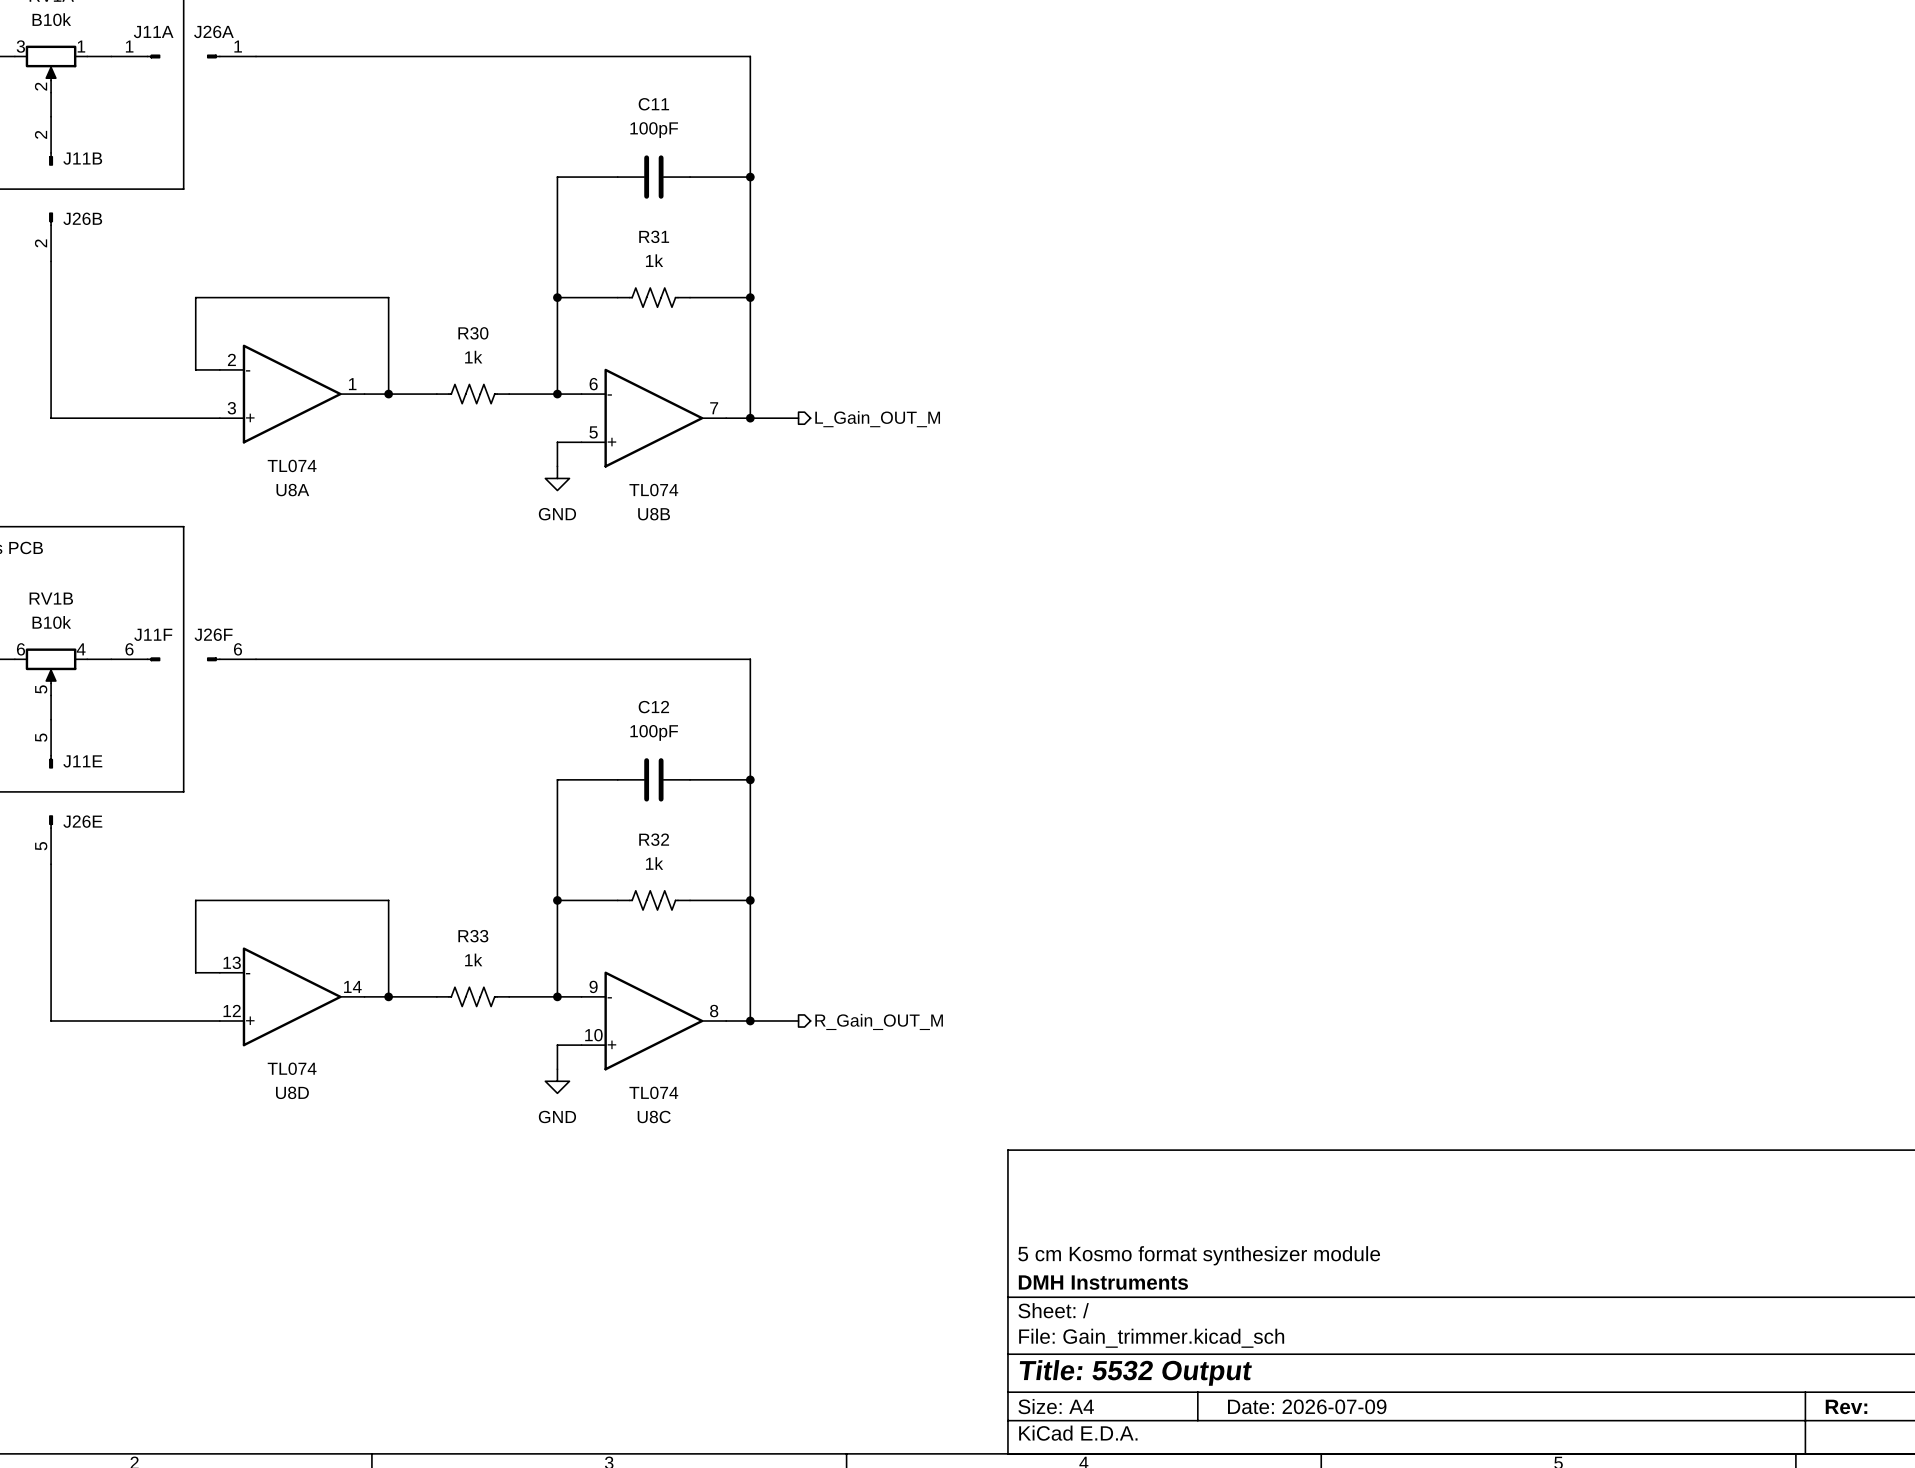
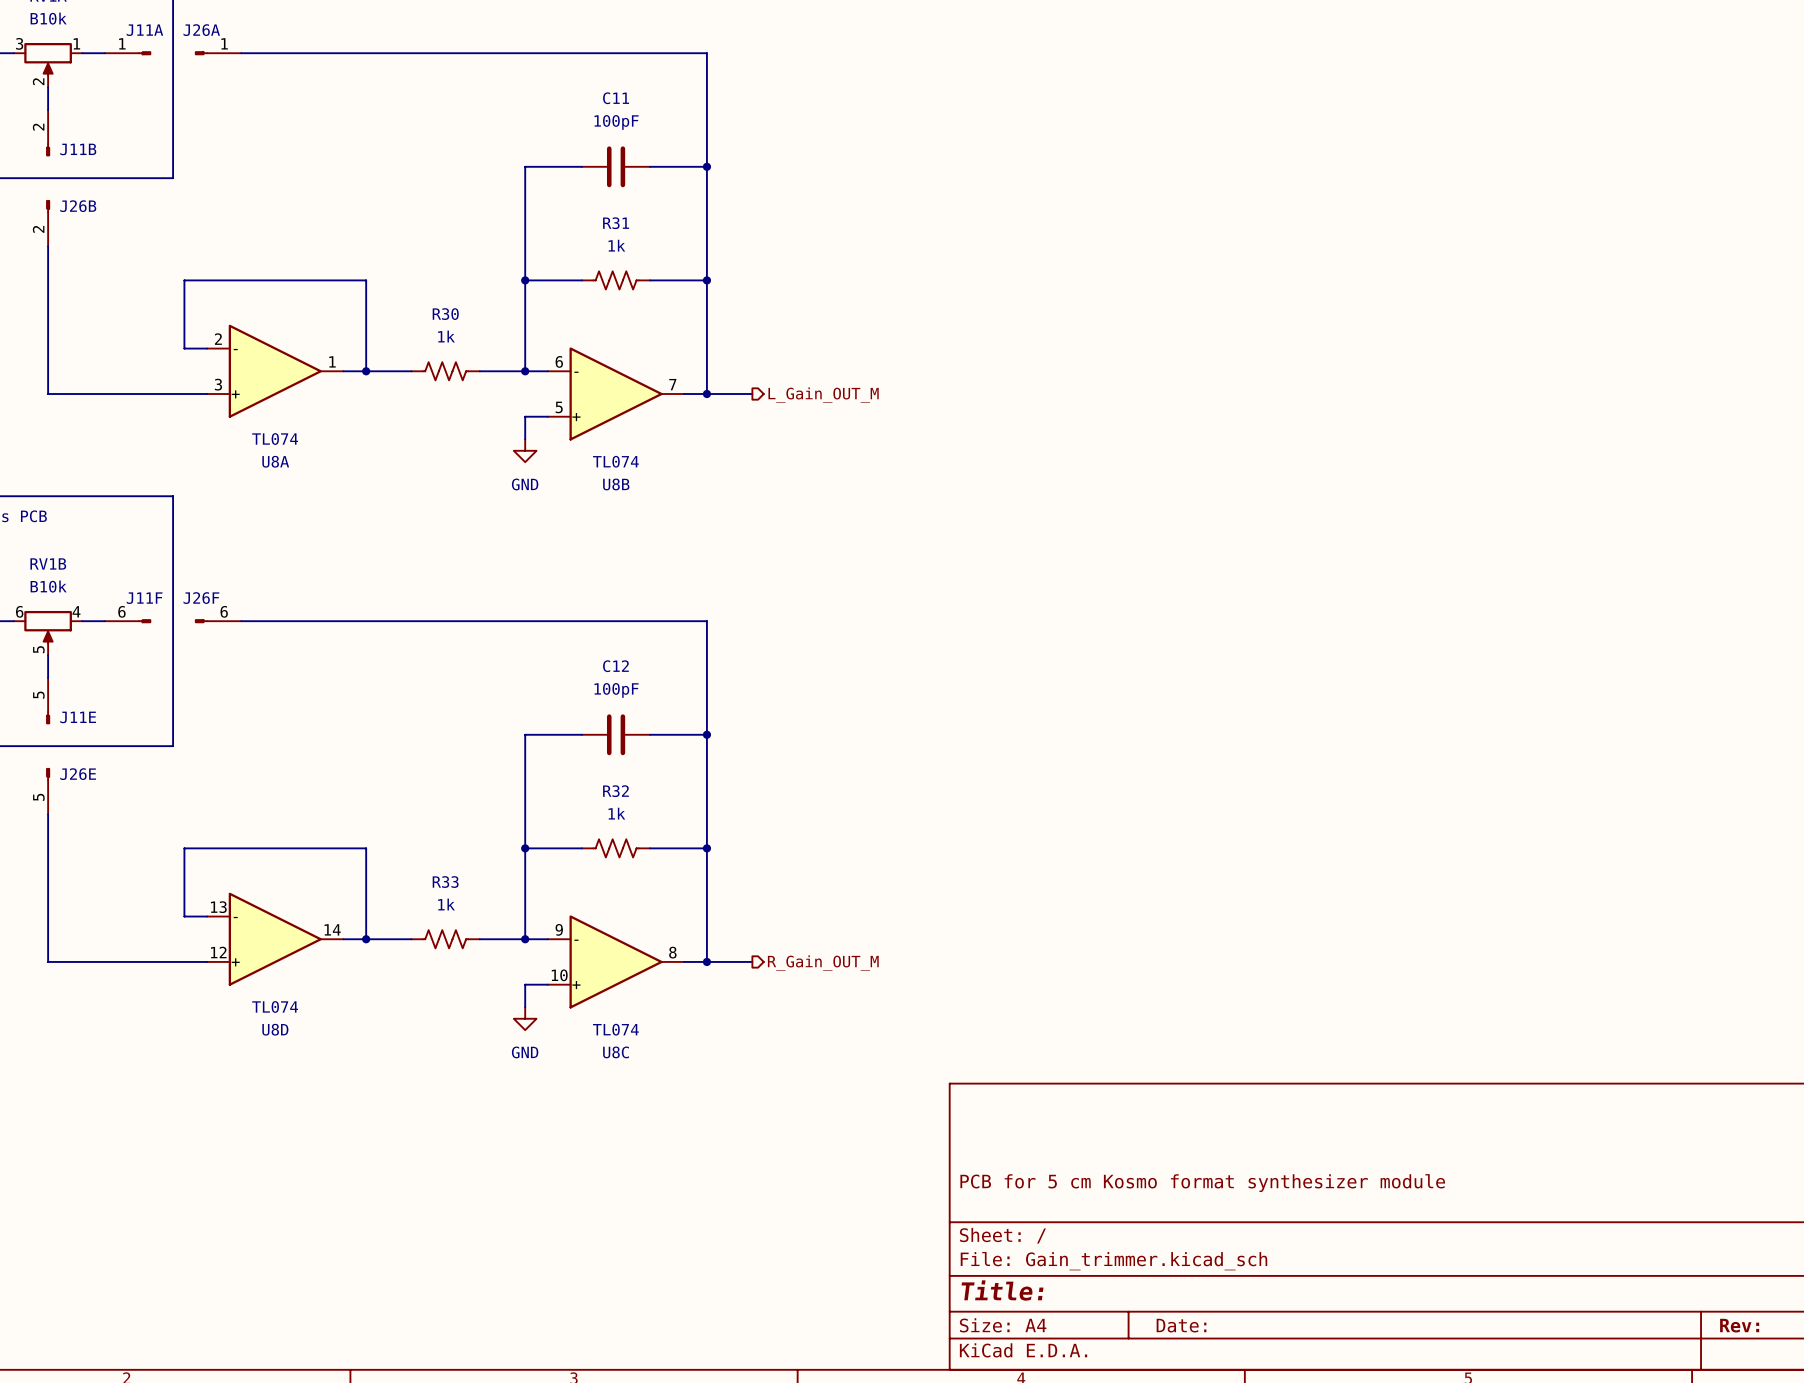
title block: 5 cm Kosmo format synthesizer module (1199, 1255) -> PCB for 5 cm Kosmo format synthesizer module (1202, 1183)
title block: DMH Instruments (1103, 1282) -> none
title block: Title: 5532 Output (1135, 1372) -> Title: (1002, 1290)
title block: Date: 2026-07-09 (1307, 1406) -> Date: (1181, 1325)

